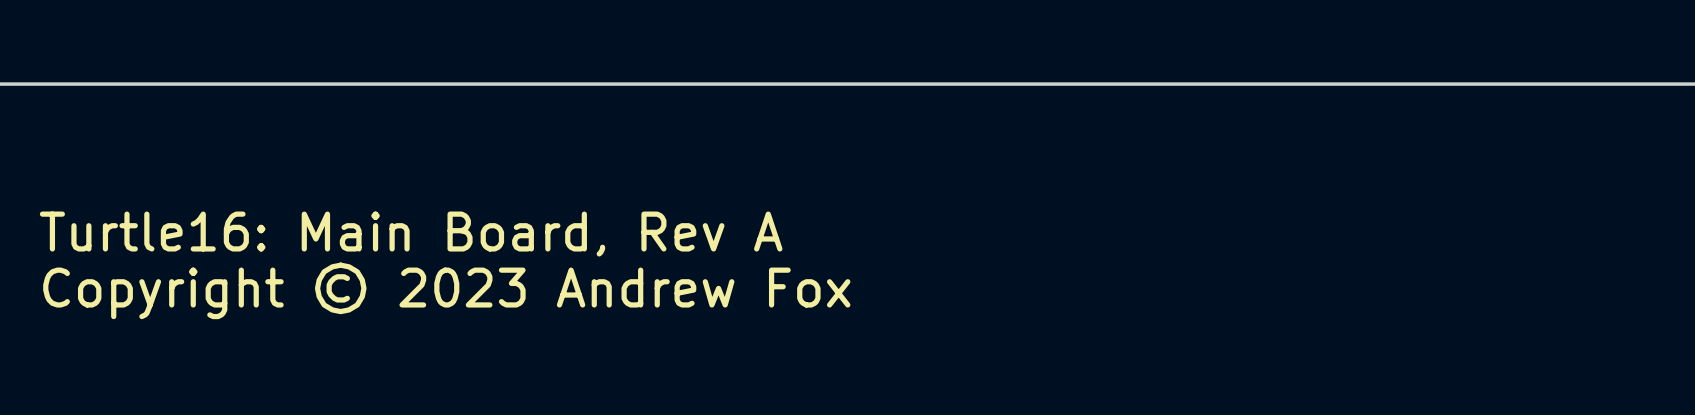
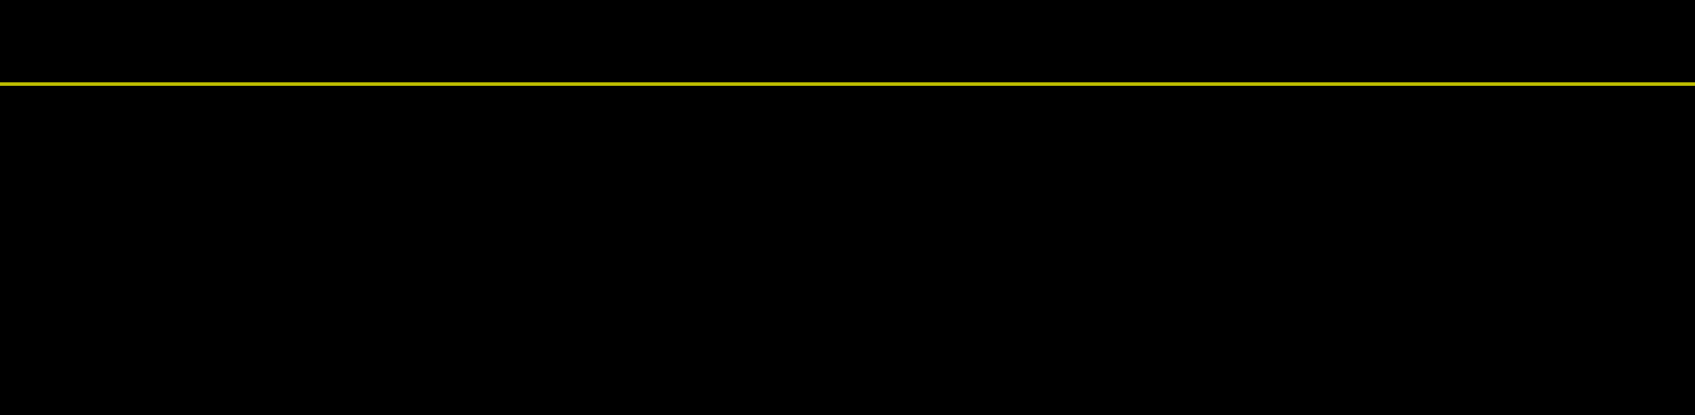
text: Turtle16: Main Board, Rev A (411, 234) -> none
text: Copyright © 2023 Andrew Fox (446, 290) -> none

